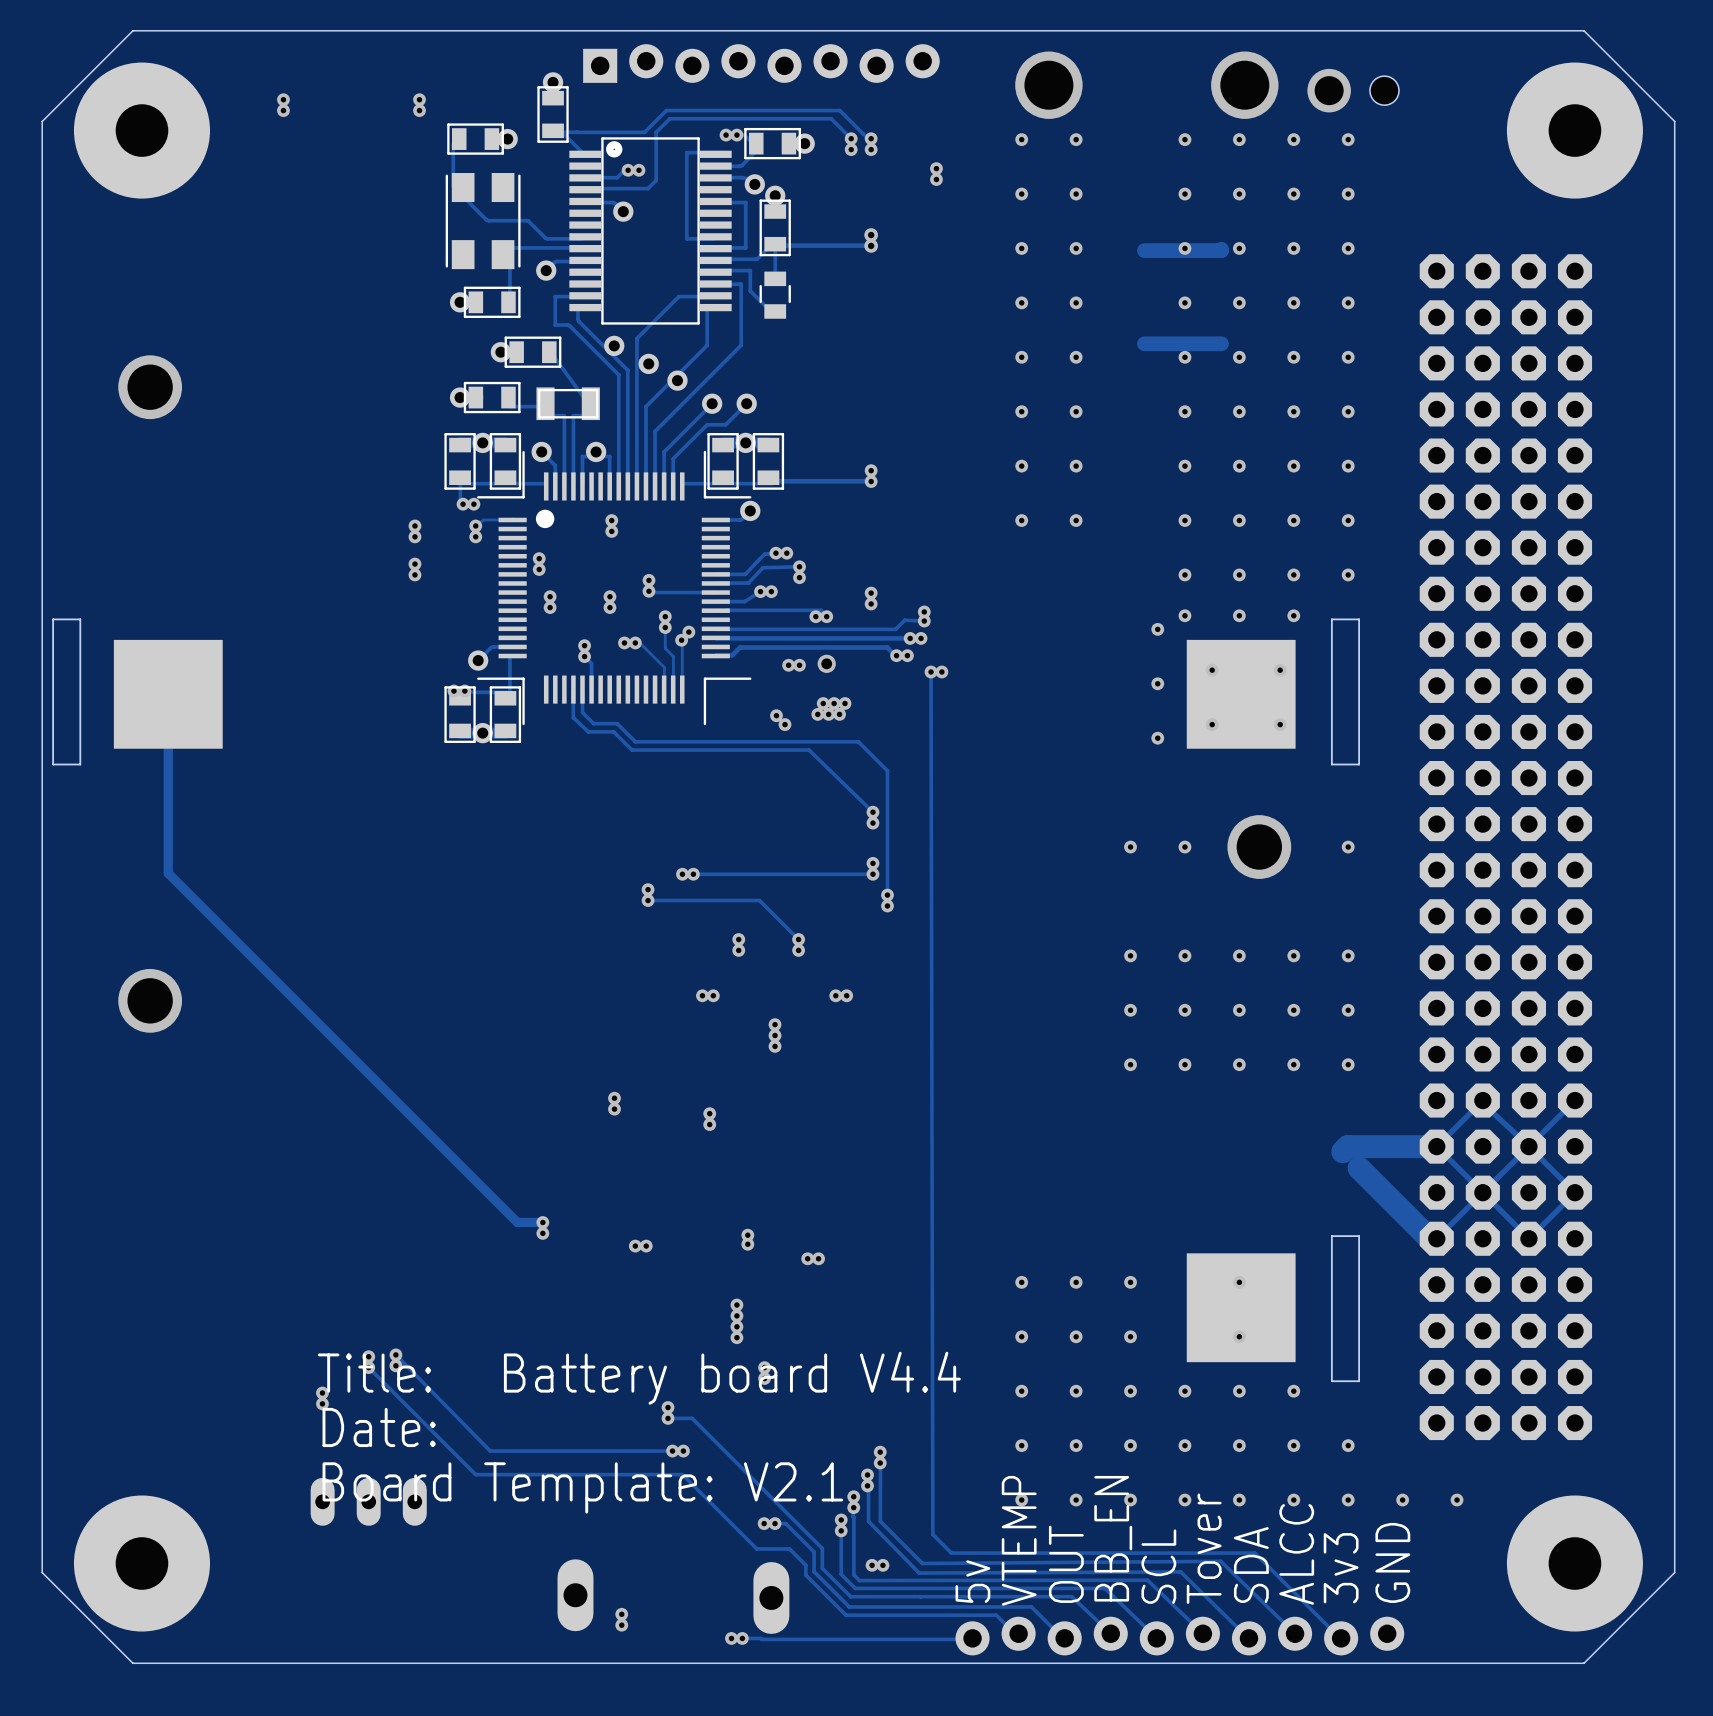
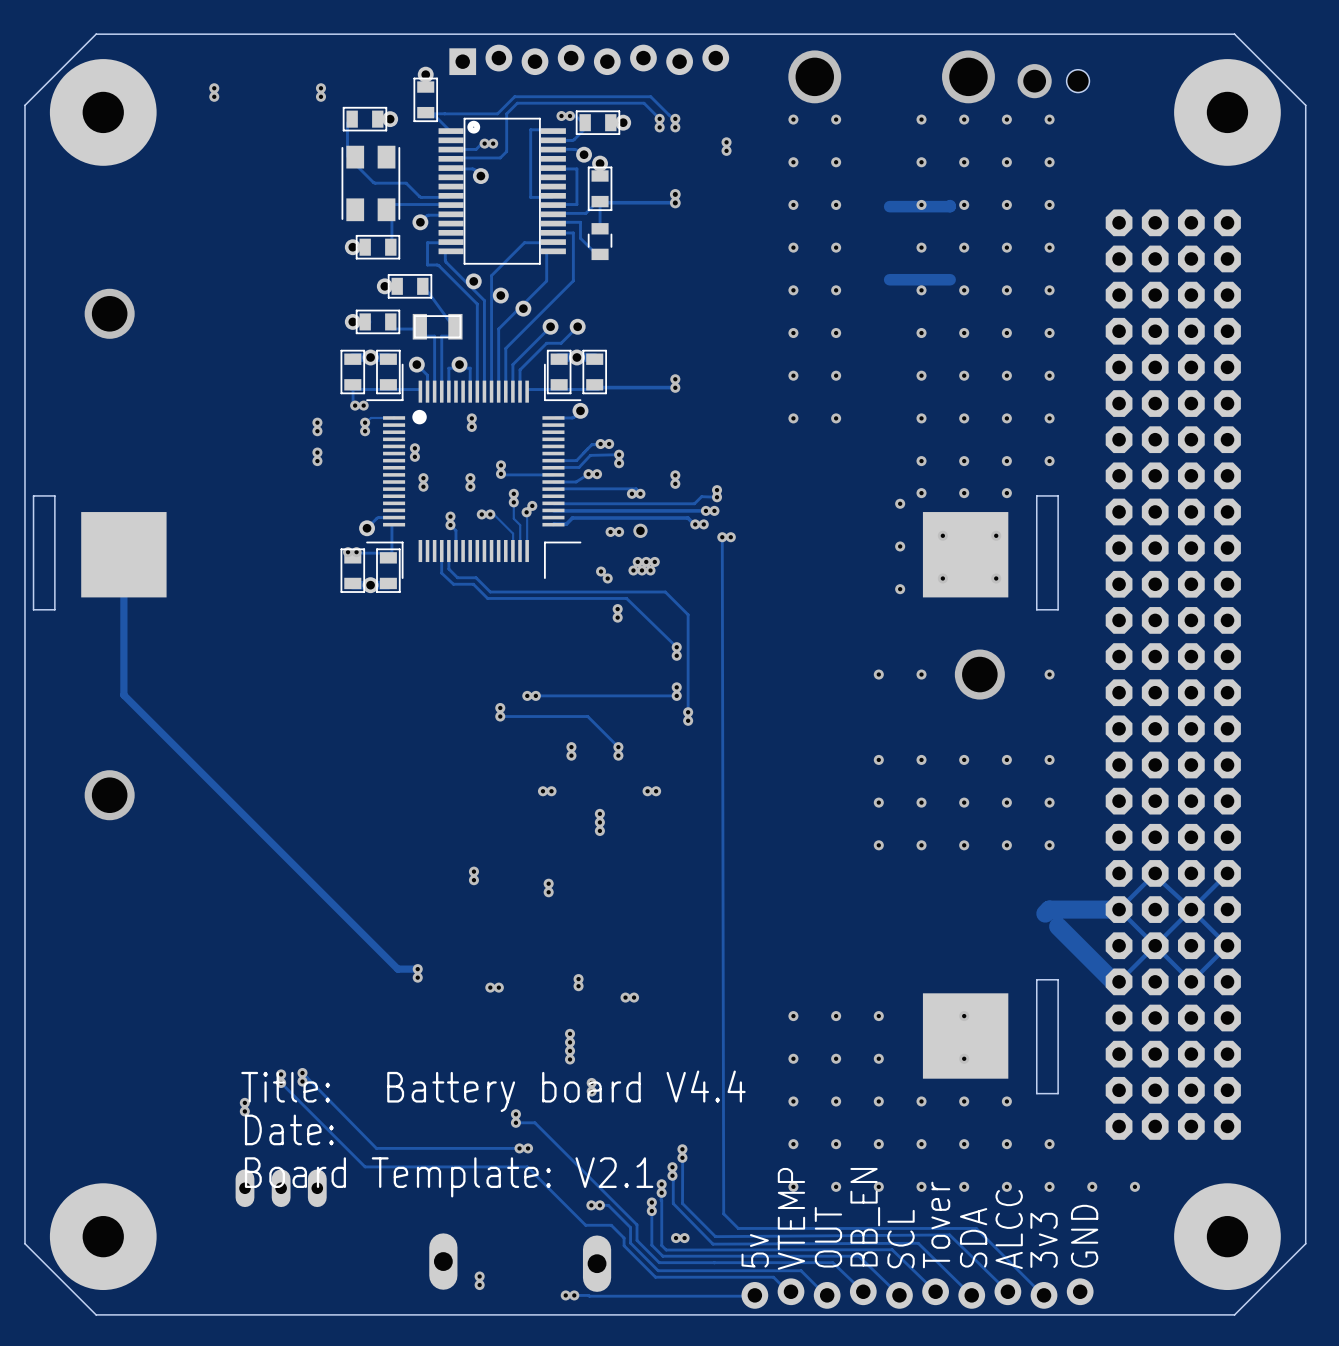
via: none -> (617, 609)
via: none -> (617, 617)

